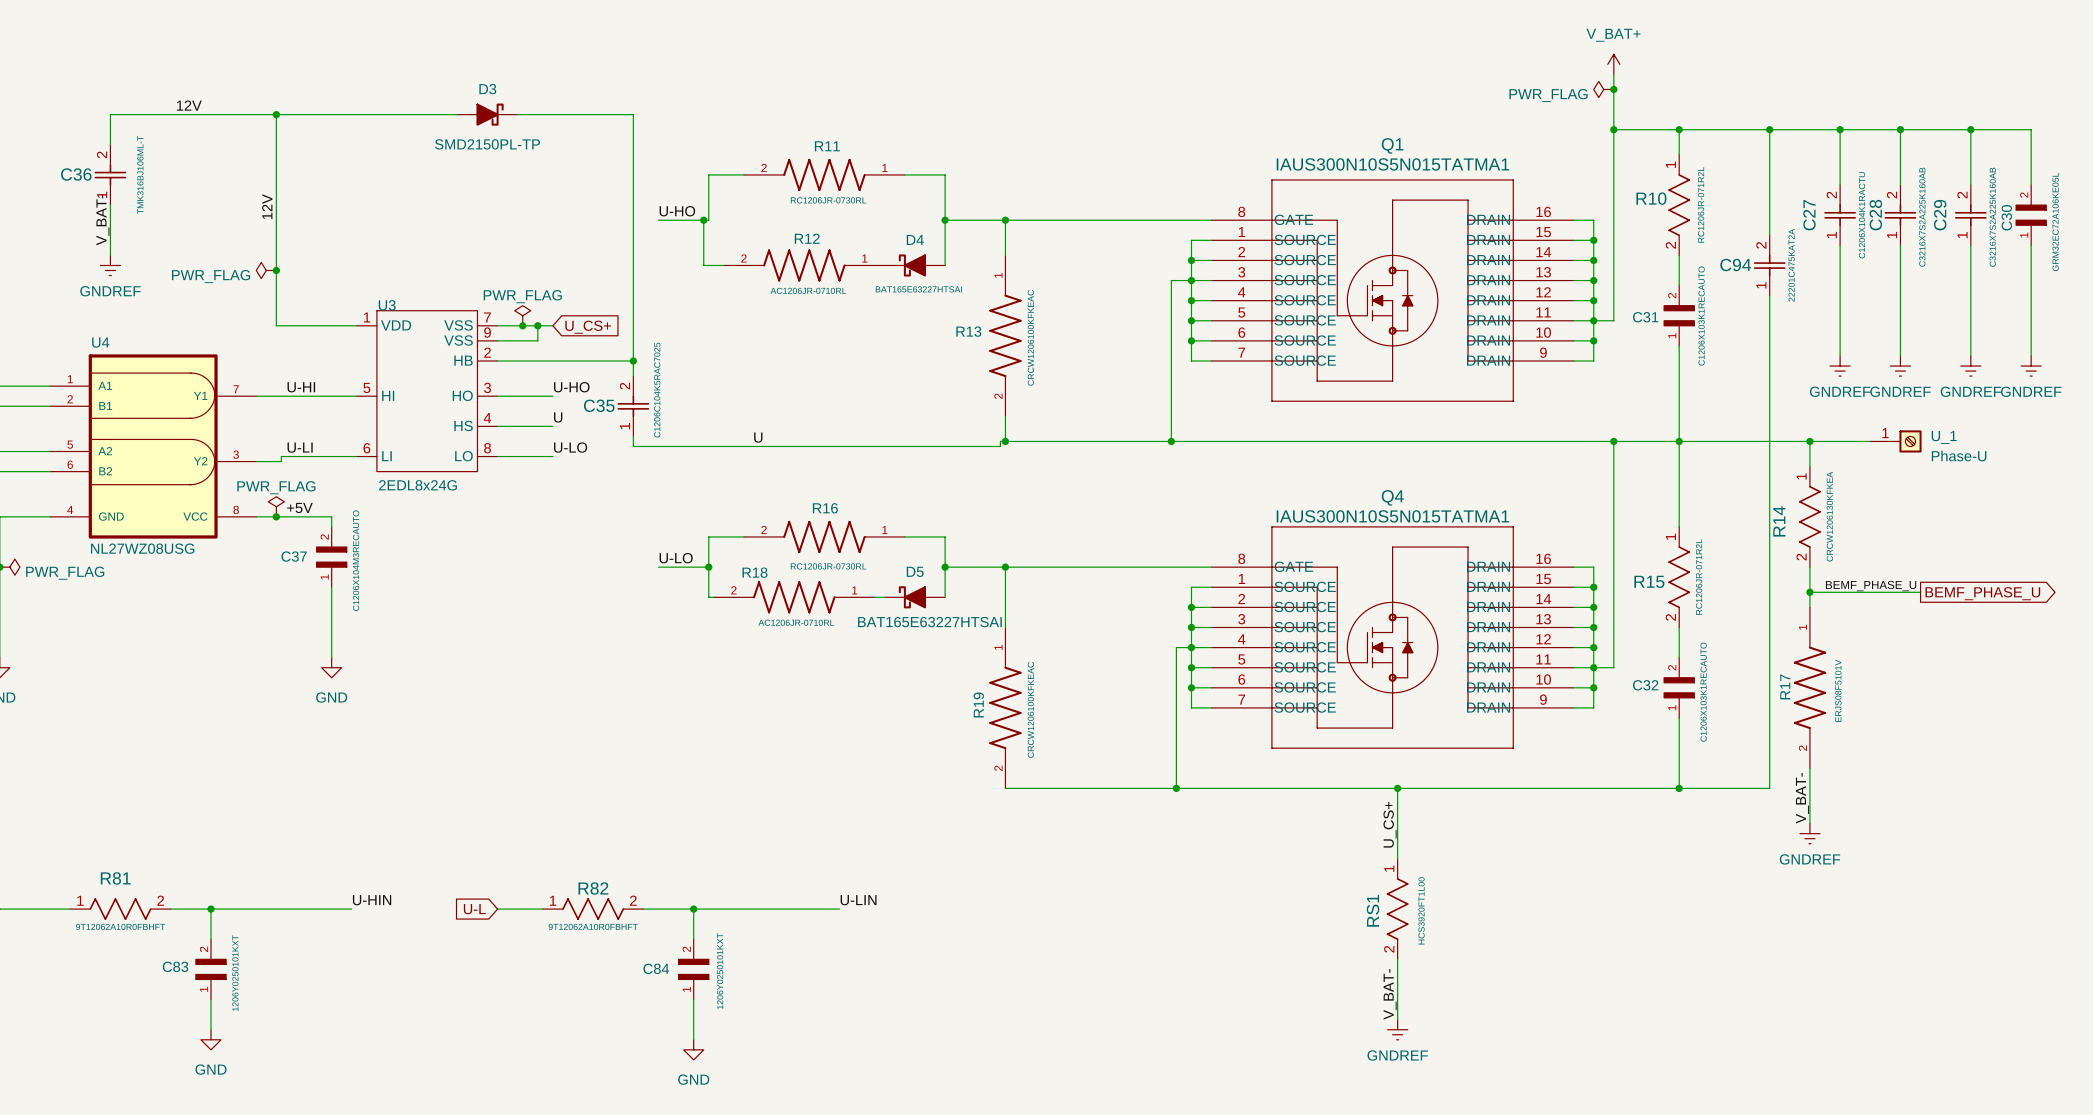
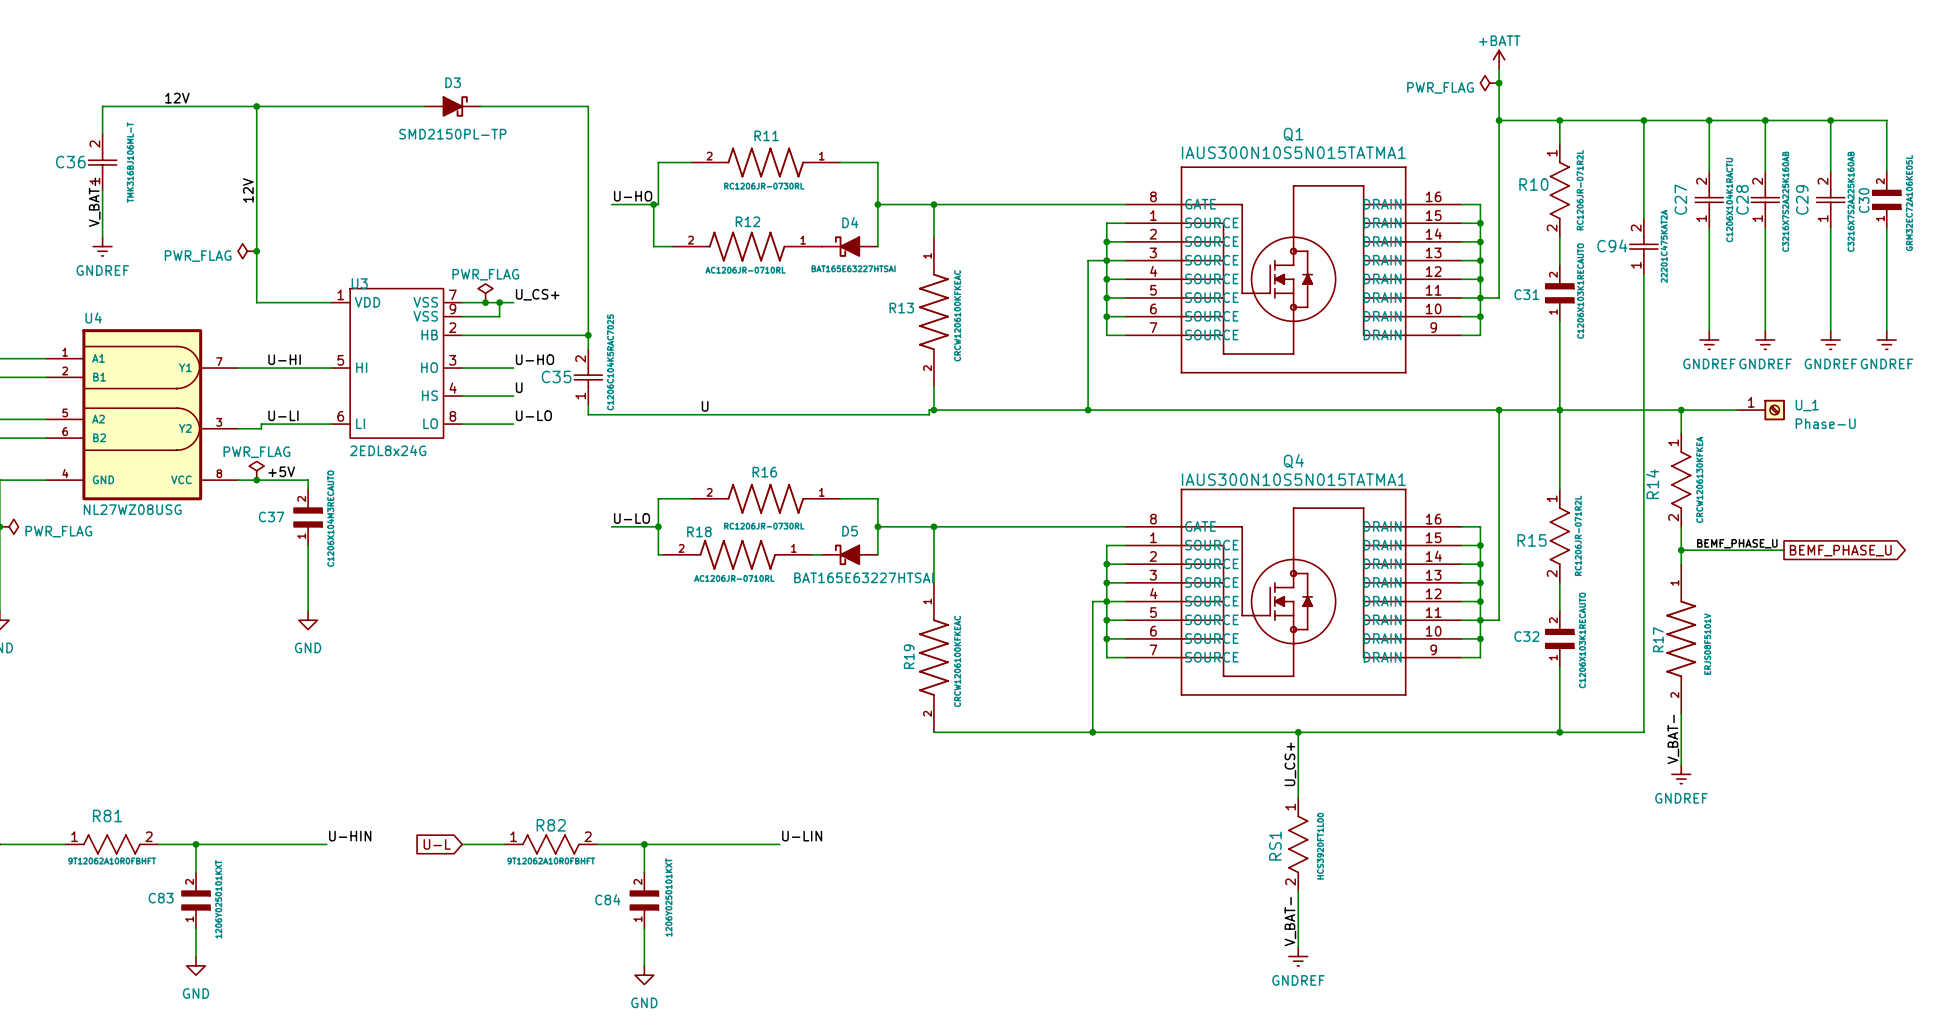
power symbol: V_BAT+ (1613, 64) -> +BATT (1499, 59)
label: none -> U_CS+ (537, 294)
global label: U_CS+ (588, 327) -> none

